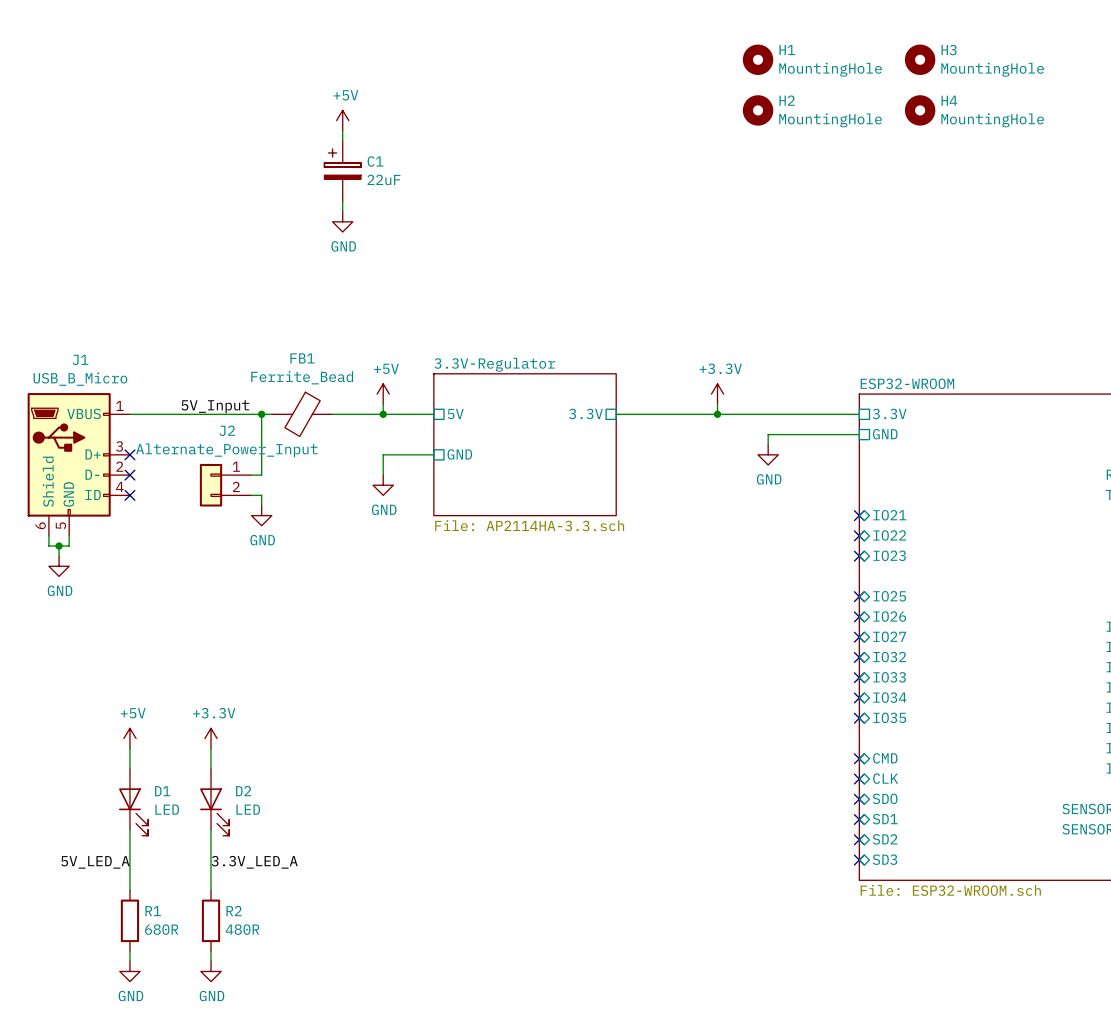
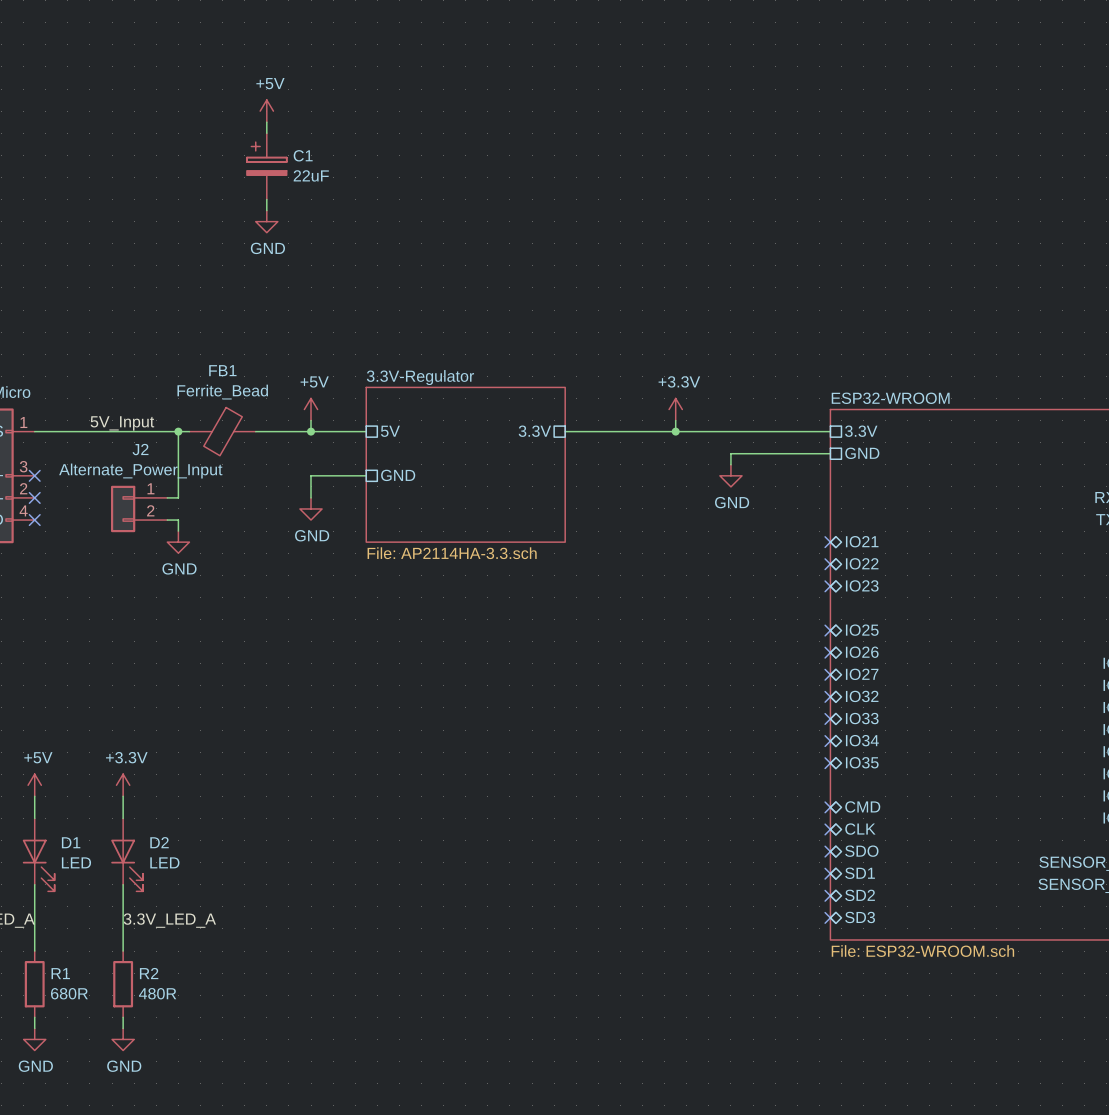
H1: MountingHole (758, 59) -> none
H3: MountingHole (920, 59) -> none
H2: MountingHole (758, 110) -> none
H4: MountingHole (920, 110) -> none

